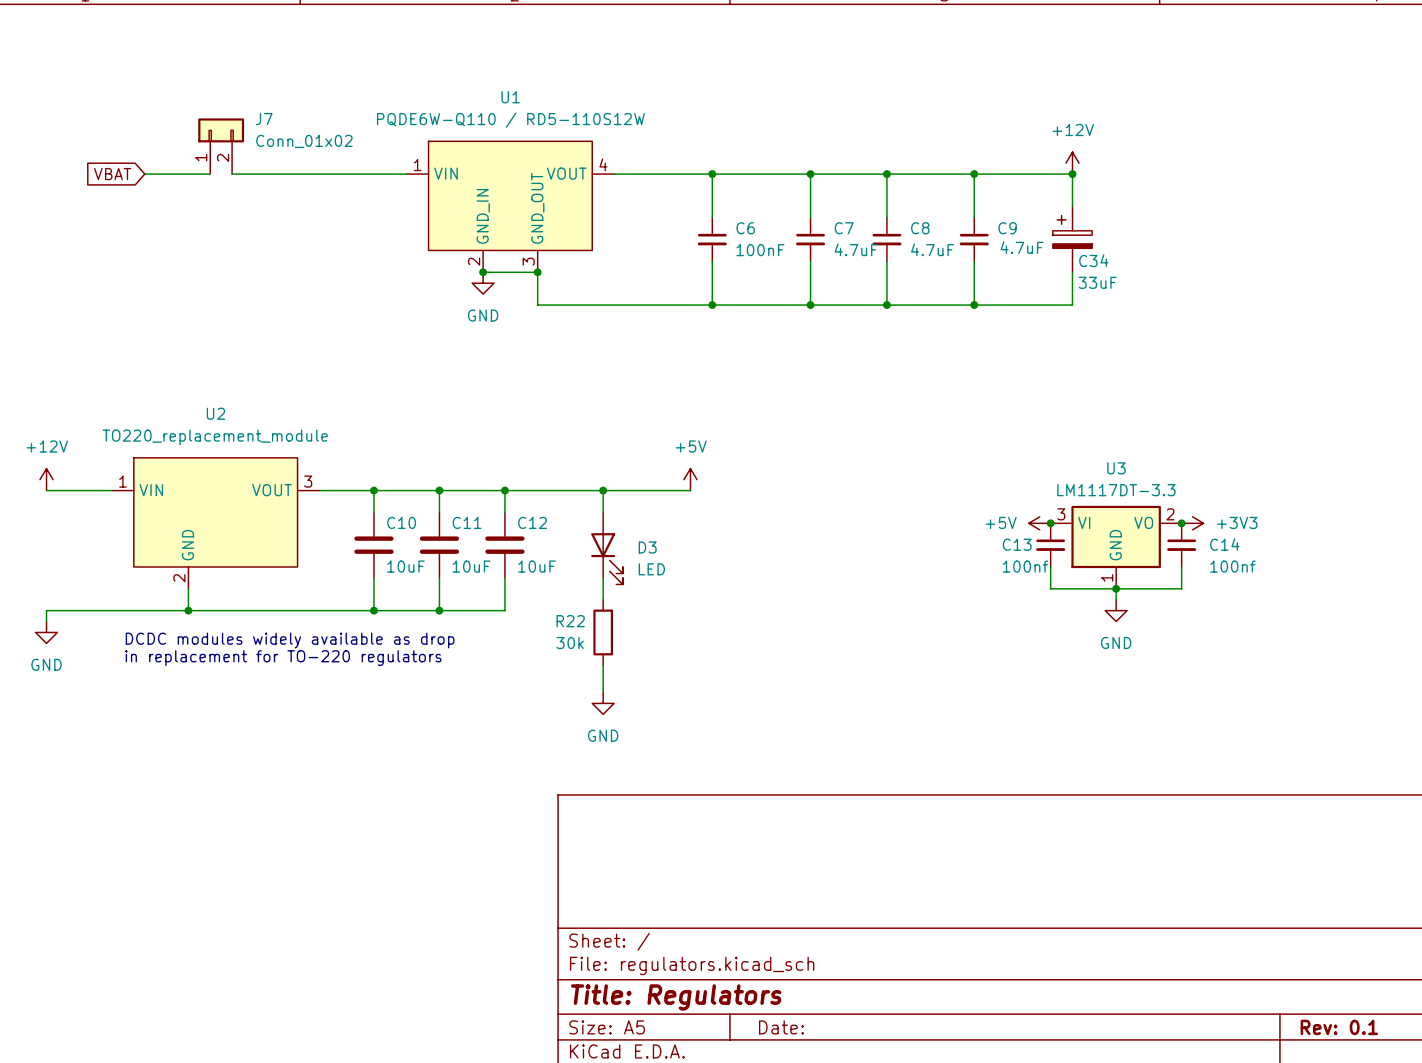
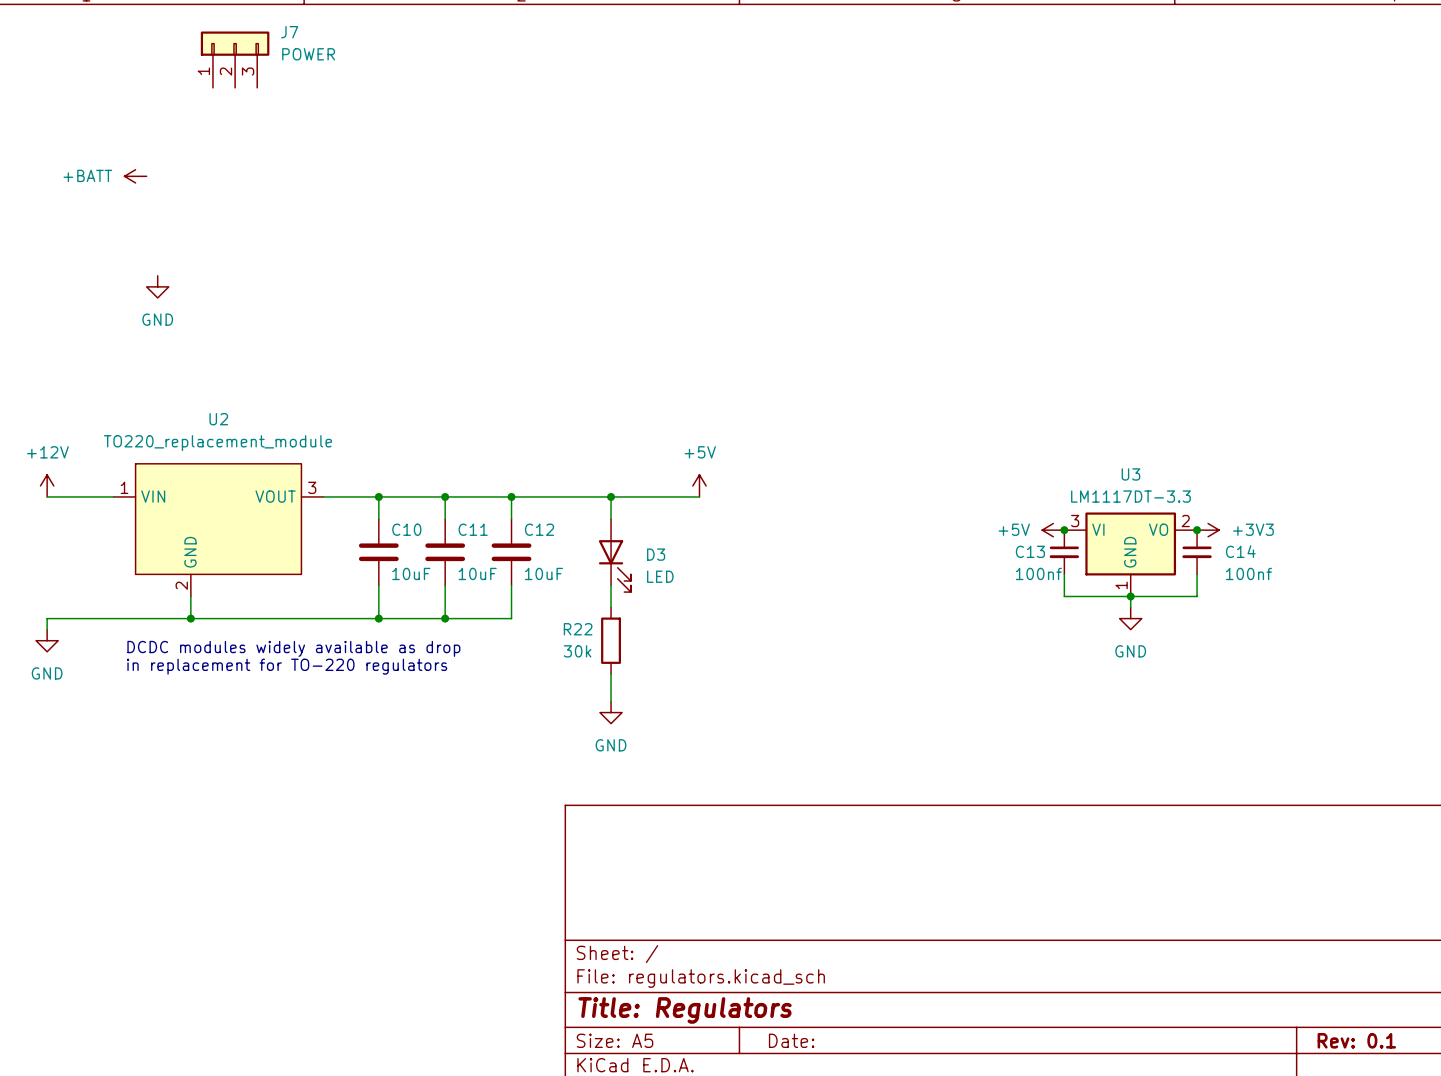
J7 symbol: [198, 118, 245, 175] -> [200, 31, 270, 88]
J7 value: Conn_01x02 (304, 141) -> POWER (308, 54)
power symbol: +12V (1072, 163) -> none
global label: VBAT (112, 174) -> none
power symbol: none -> +BATT (135, 176)
wire: (144, 174) (210, 174) -> none
wire: (232, 174) (406, 174) -> none
wire: (614, 174) (1072, 174) (1072, 206) -> none
wire: (712, 174) (712, 217) -> none
junction: (712, 174) -> none
wire: (810, 174) (810, 217) -> none
junction: (810, 174) -> none
wire: (886, 174) (886, 217) -> none
junction: (886, 174) -> none
wire: (974, 174) (974, 217) -> none
junction: (974, 174) -> none
junction: (1072, 174) -> none
U1: PQDE6W-Q110 / RD5-110S12W (510, 206) -> none
C6: 100nF (712, 239) -> none
C7: 4.7uF (810, 239) -> none
C8: 4.7uF (886, 239) -> none
C9: 4.7uF (974, 239) -> none
C34: 33uF (1072, 239) -> none
wire: (712, 261) (712, 305) -> none
wire: (810, 261) (810, 305) -> none
wire: (886, 261) (886, 305) -> none
wire: (974, 261) (974, 305) -> none
wire: (483, 272) (537, 272) (537, 305) (1072, 305) (1072, 272) -> none
junction: (483, 272) -> none
junction: (537, 272) -> none
power symbol: none -> GND (157, 286)
power symbol: GND (483, 283) -> none
junction: (712, 305) -> none
junction: (810, 305) -> none
junction: (886, 305) -> none
junction: (974, 305) -> none

